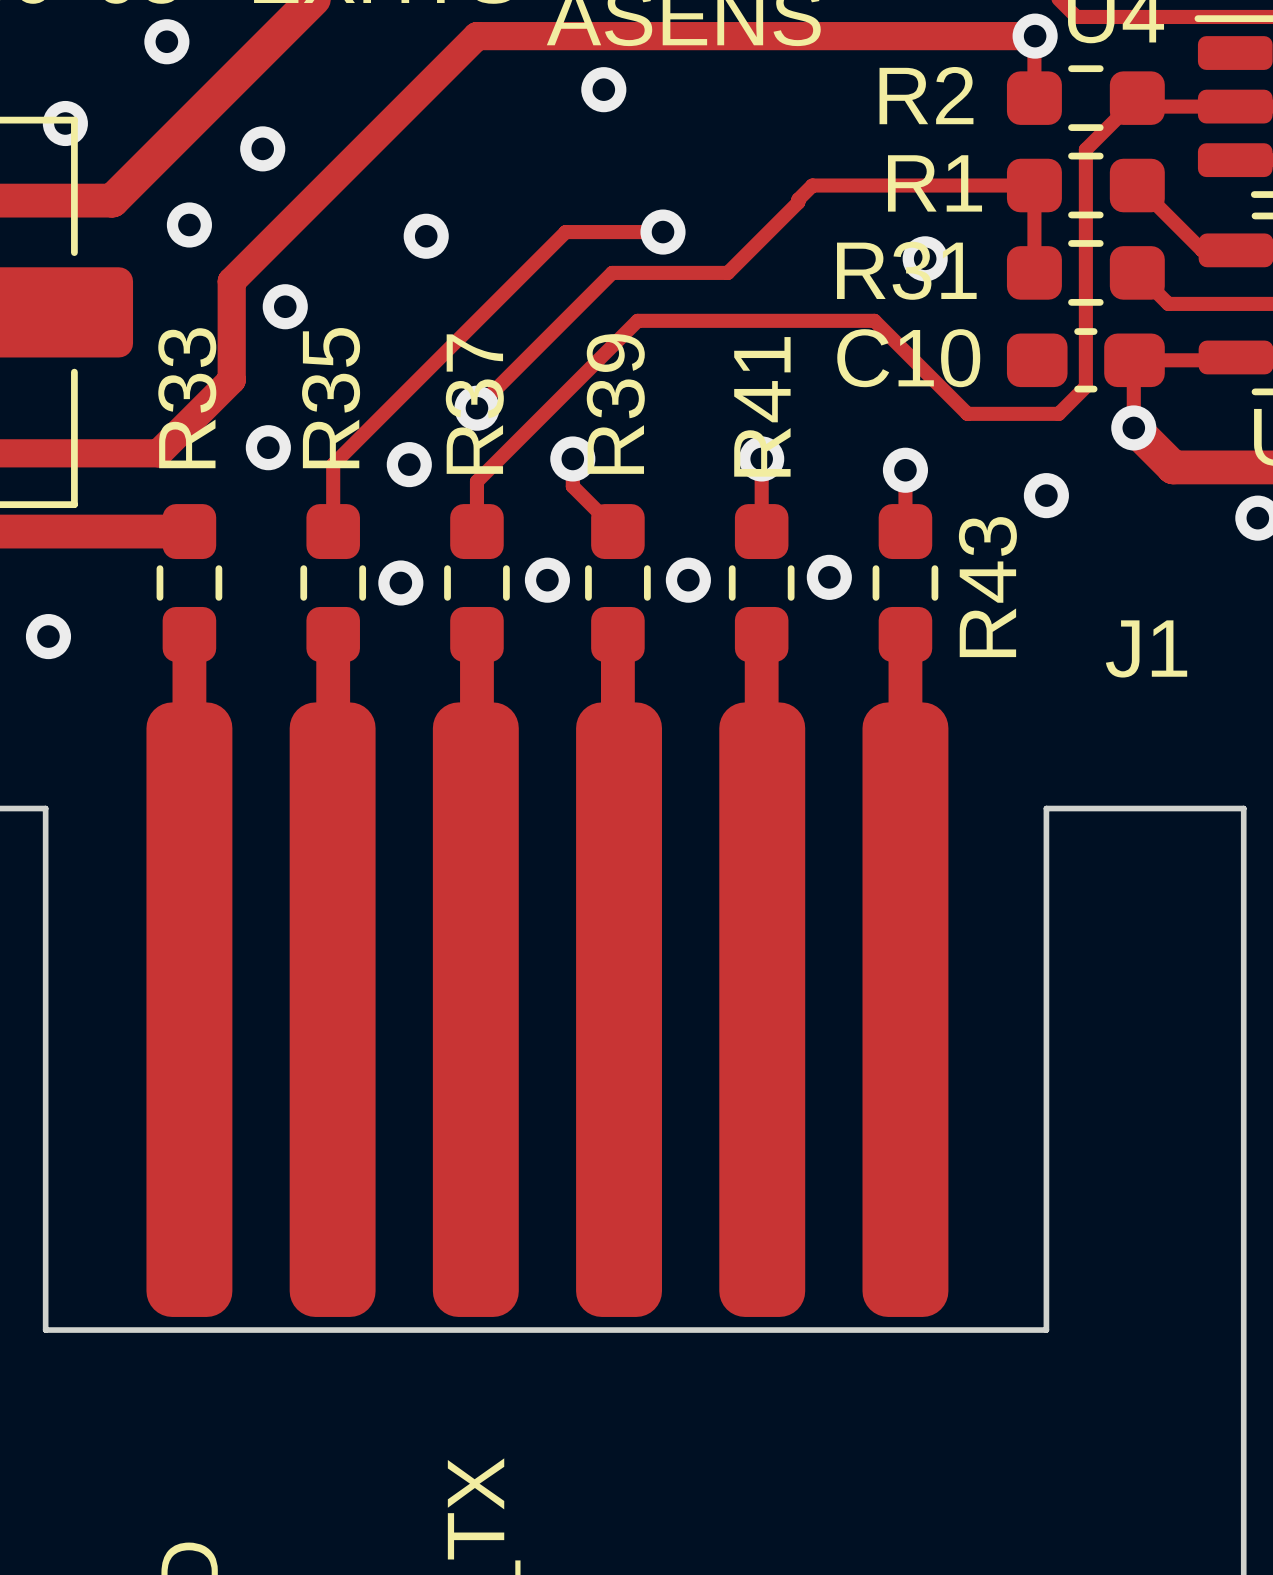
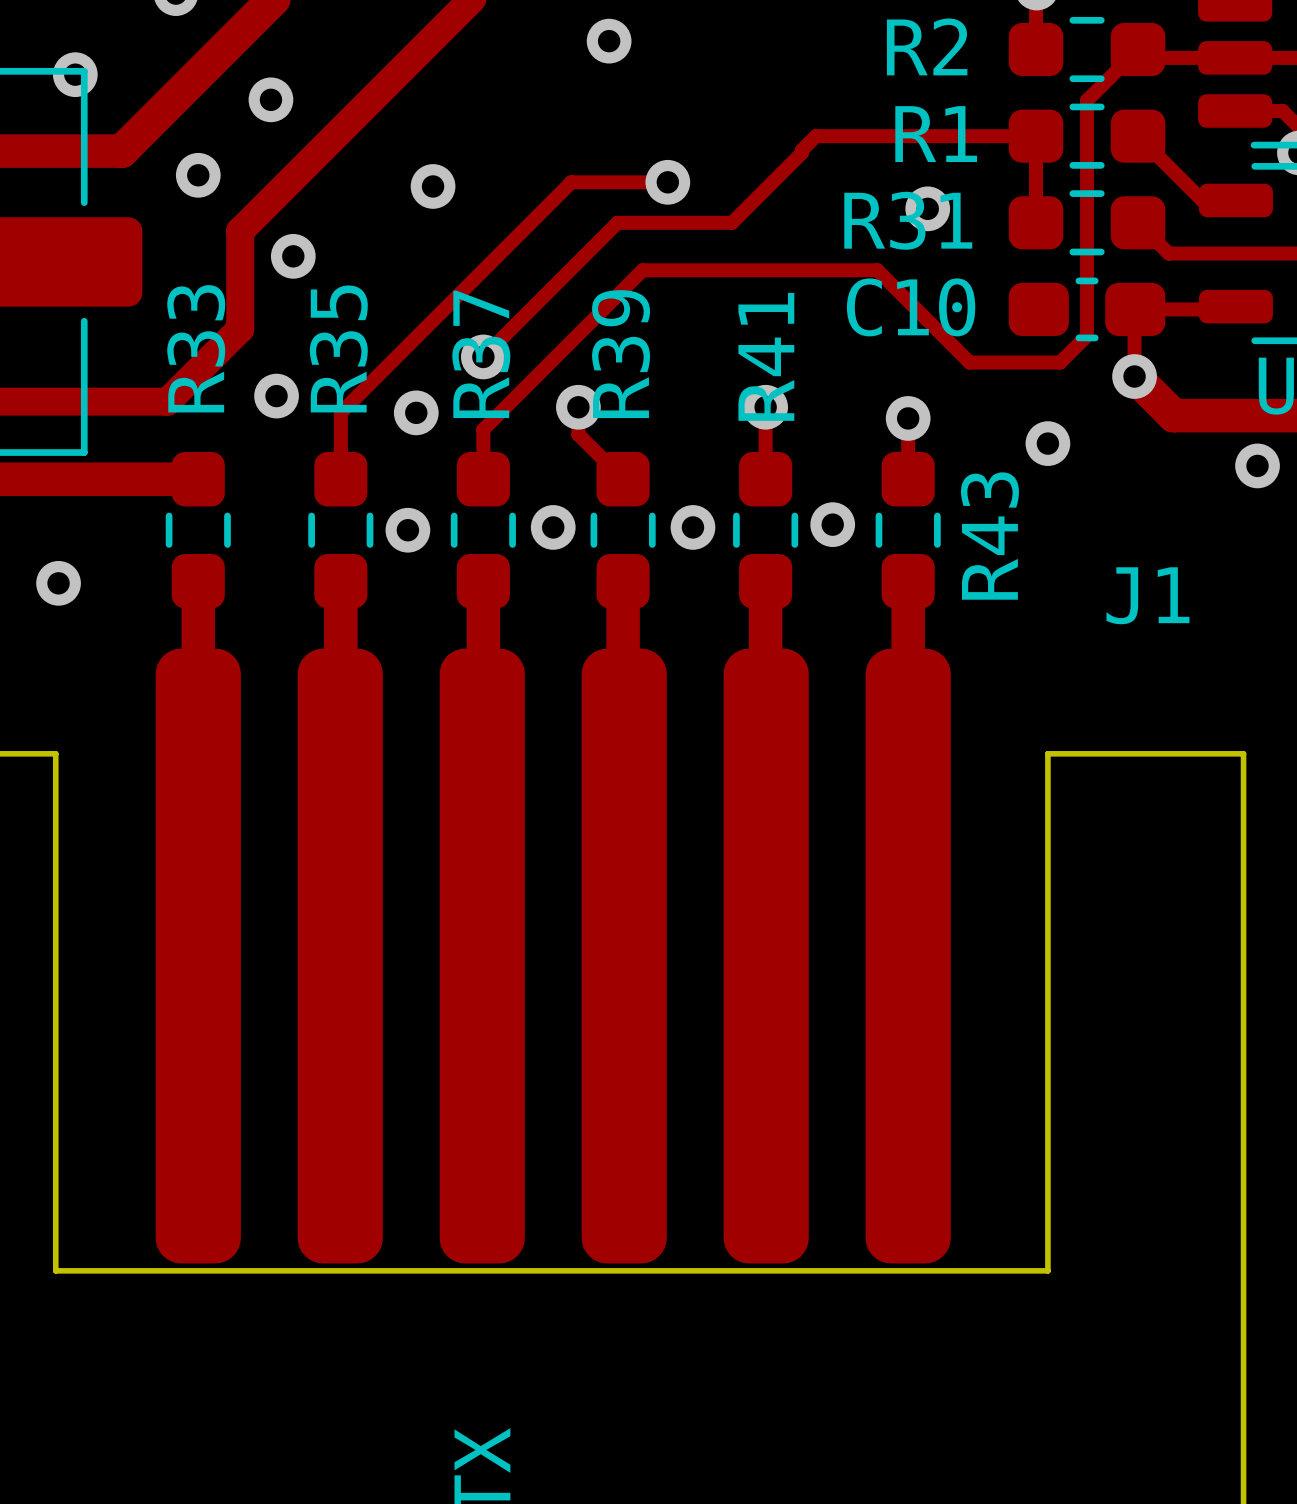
J1 footprint: [146, 702, 949, 1317] -> [155, 648, 951, 1264]

